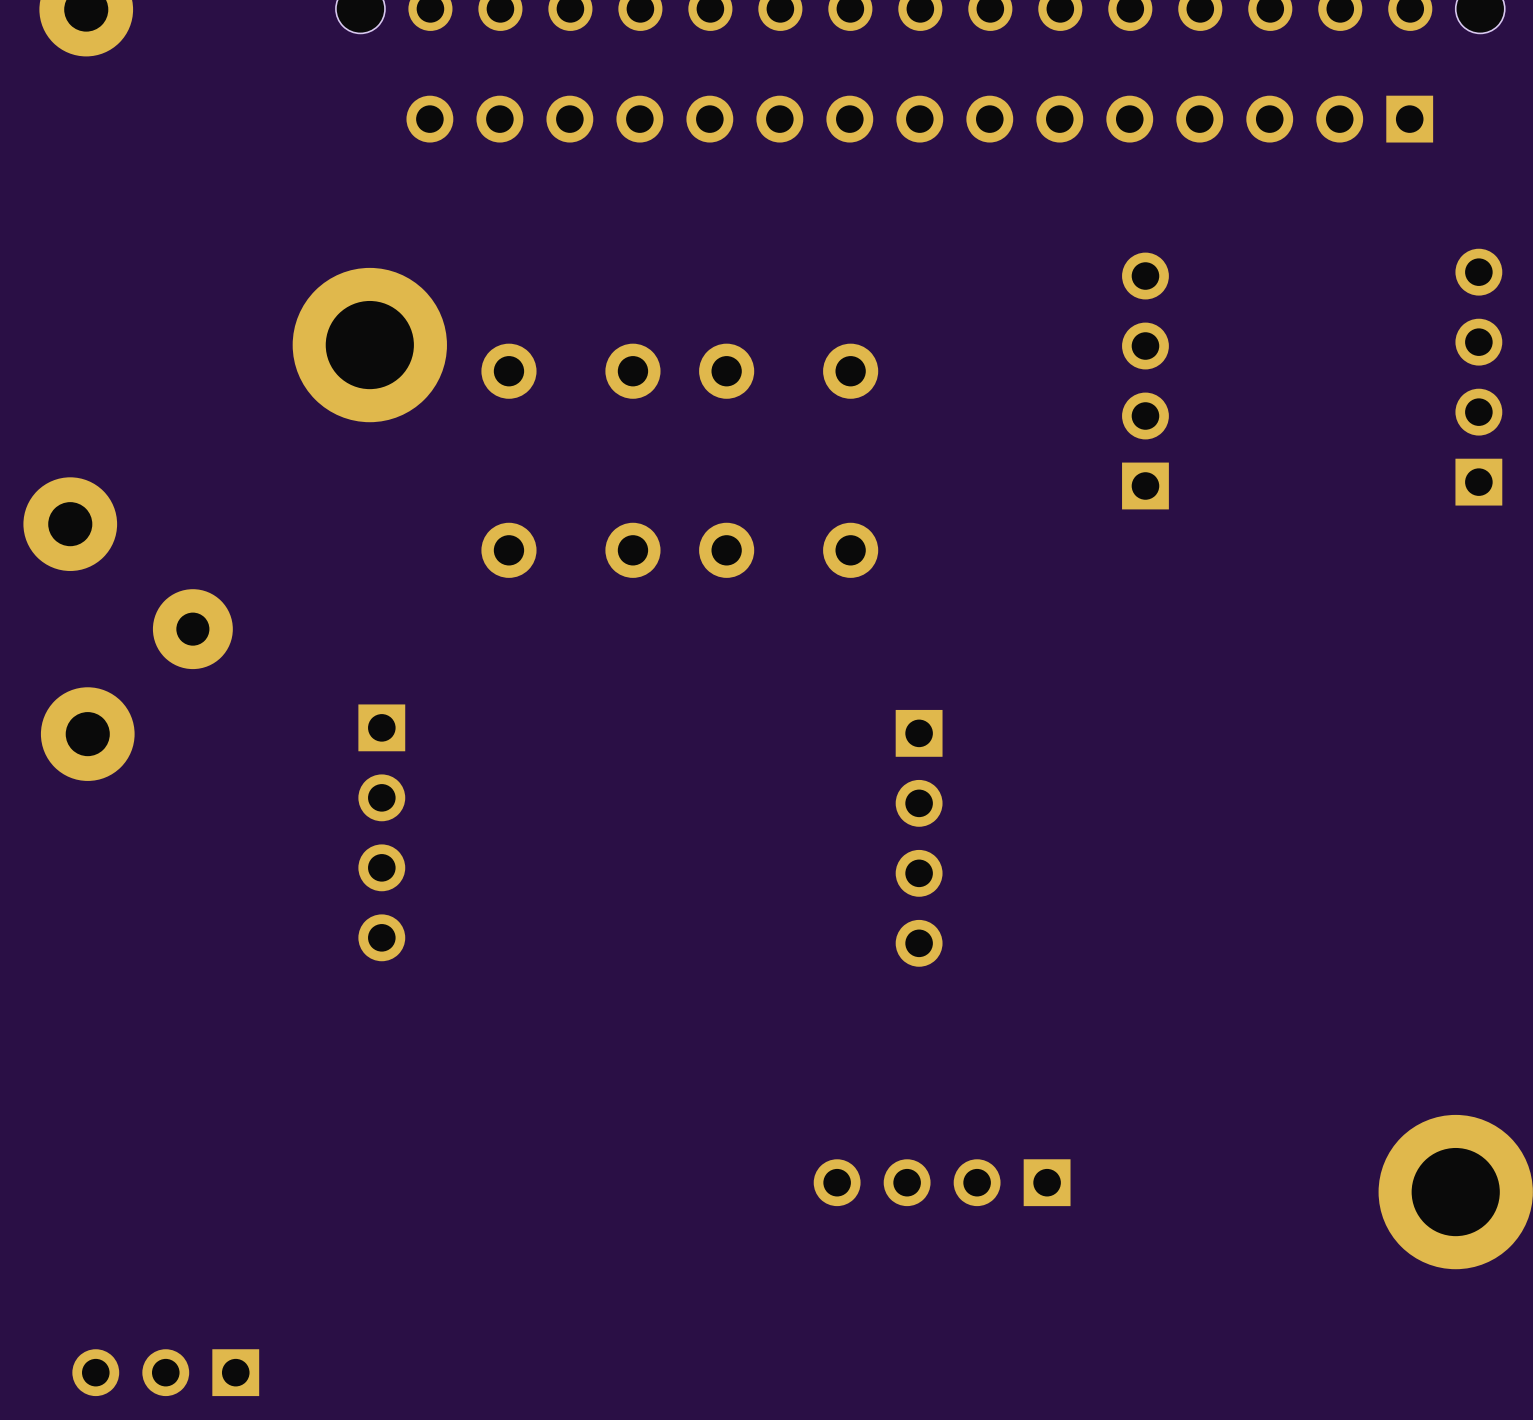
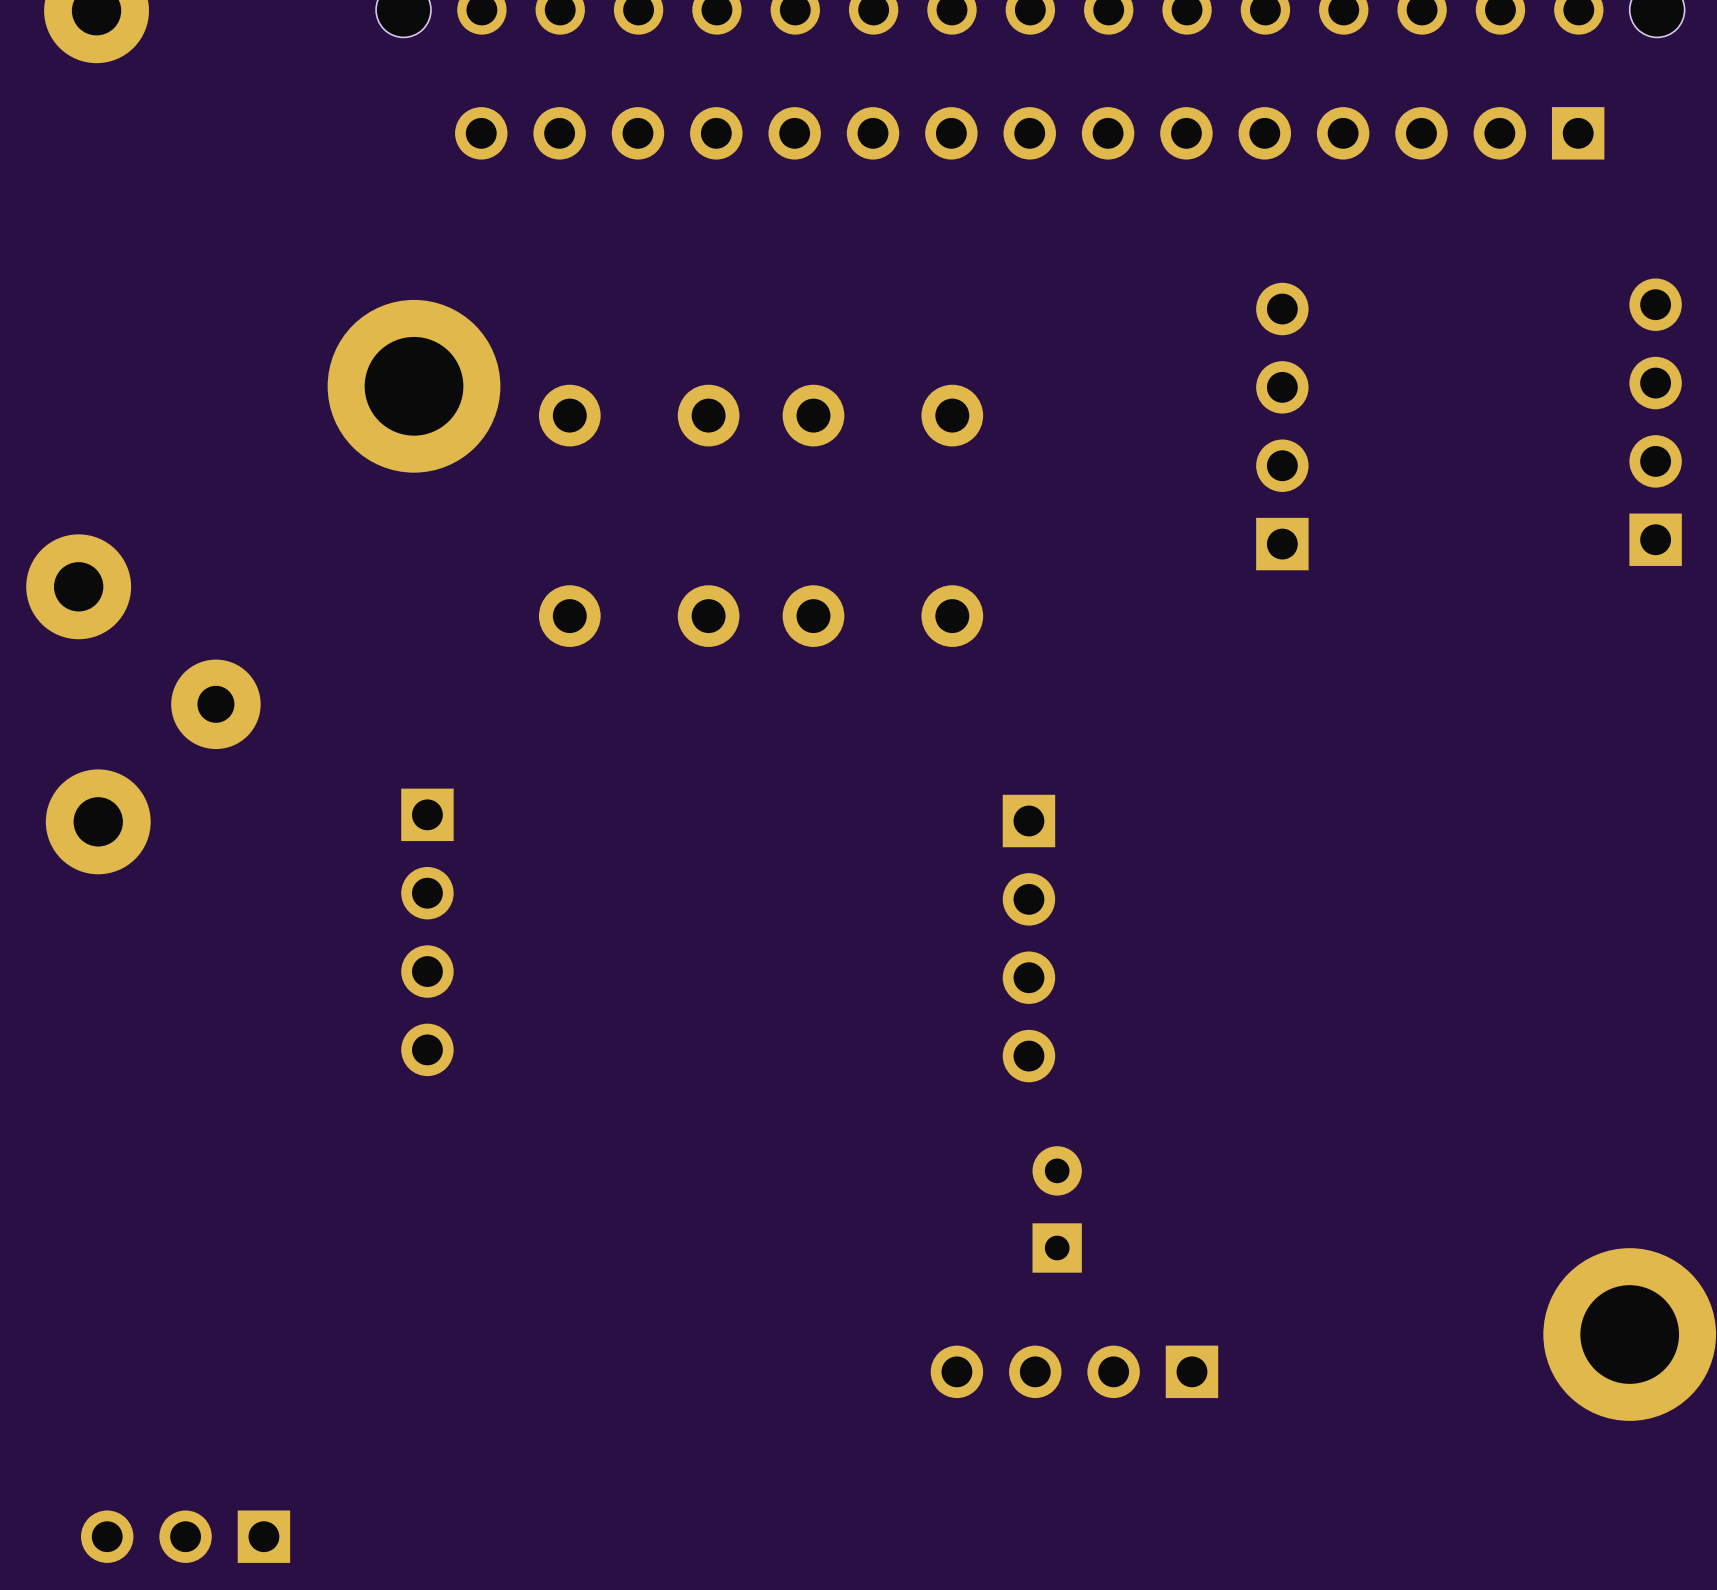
part: none -> (1057, 1209)
part position: (942, 1182) -> (1074, 1371)

